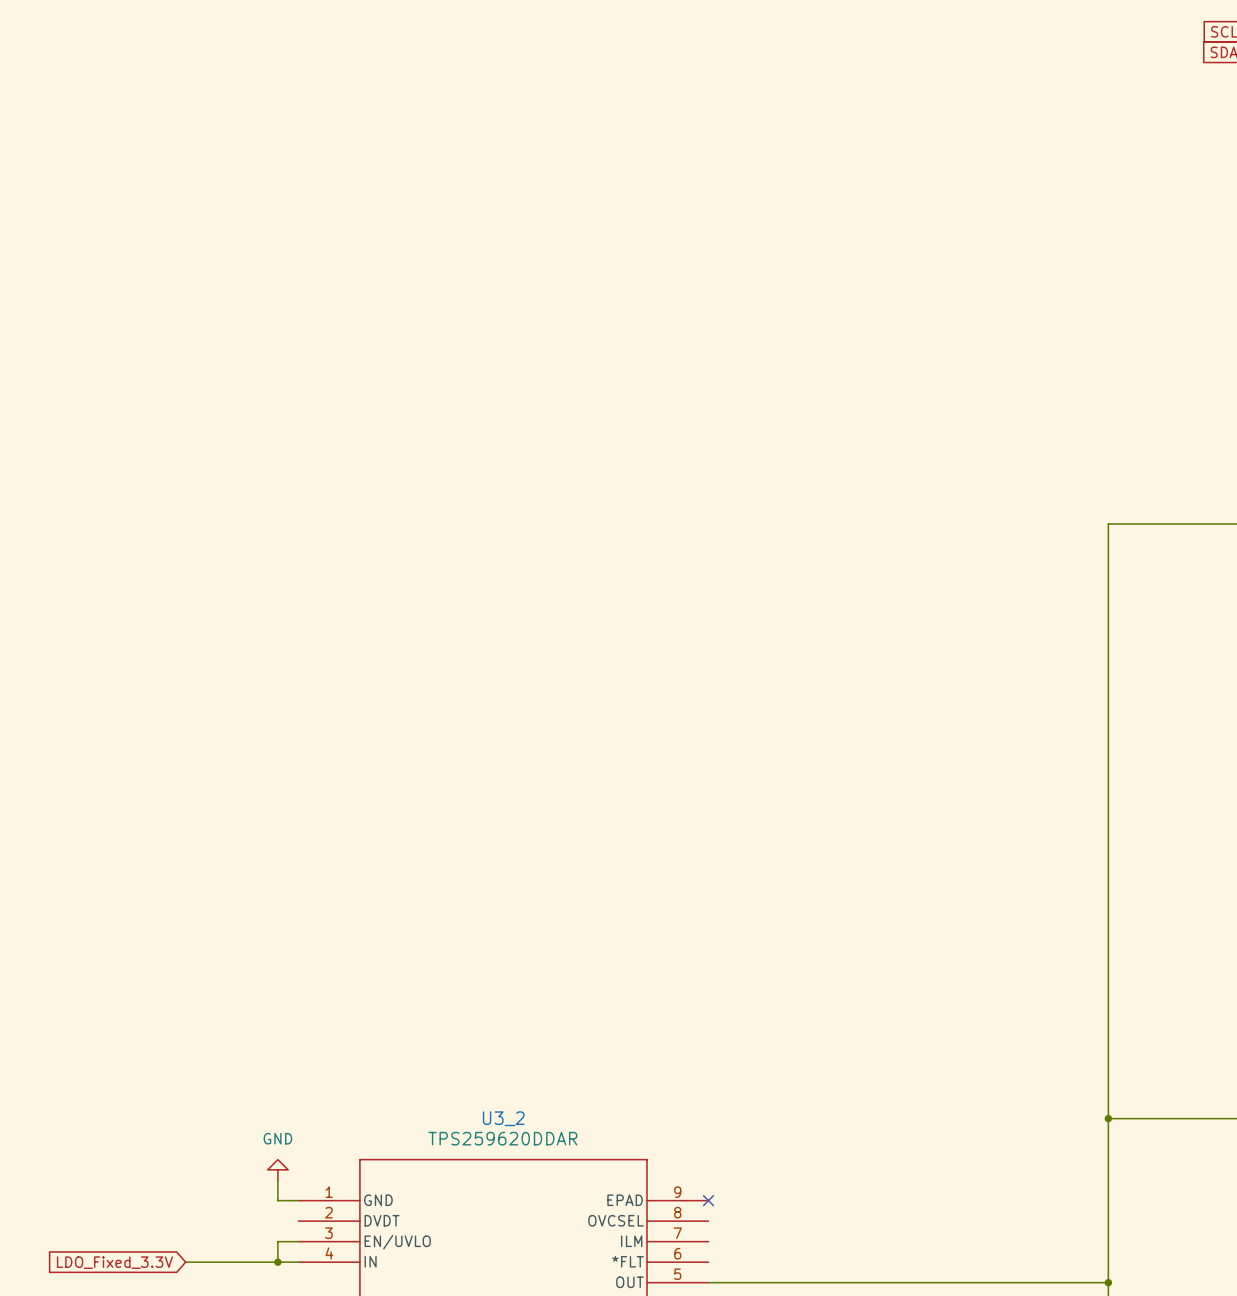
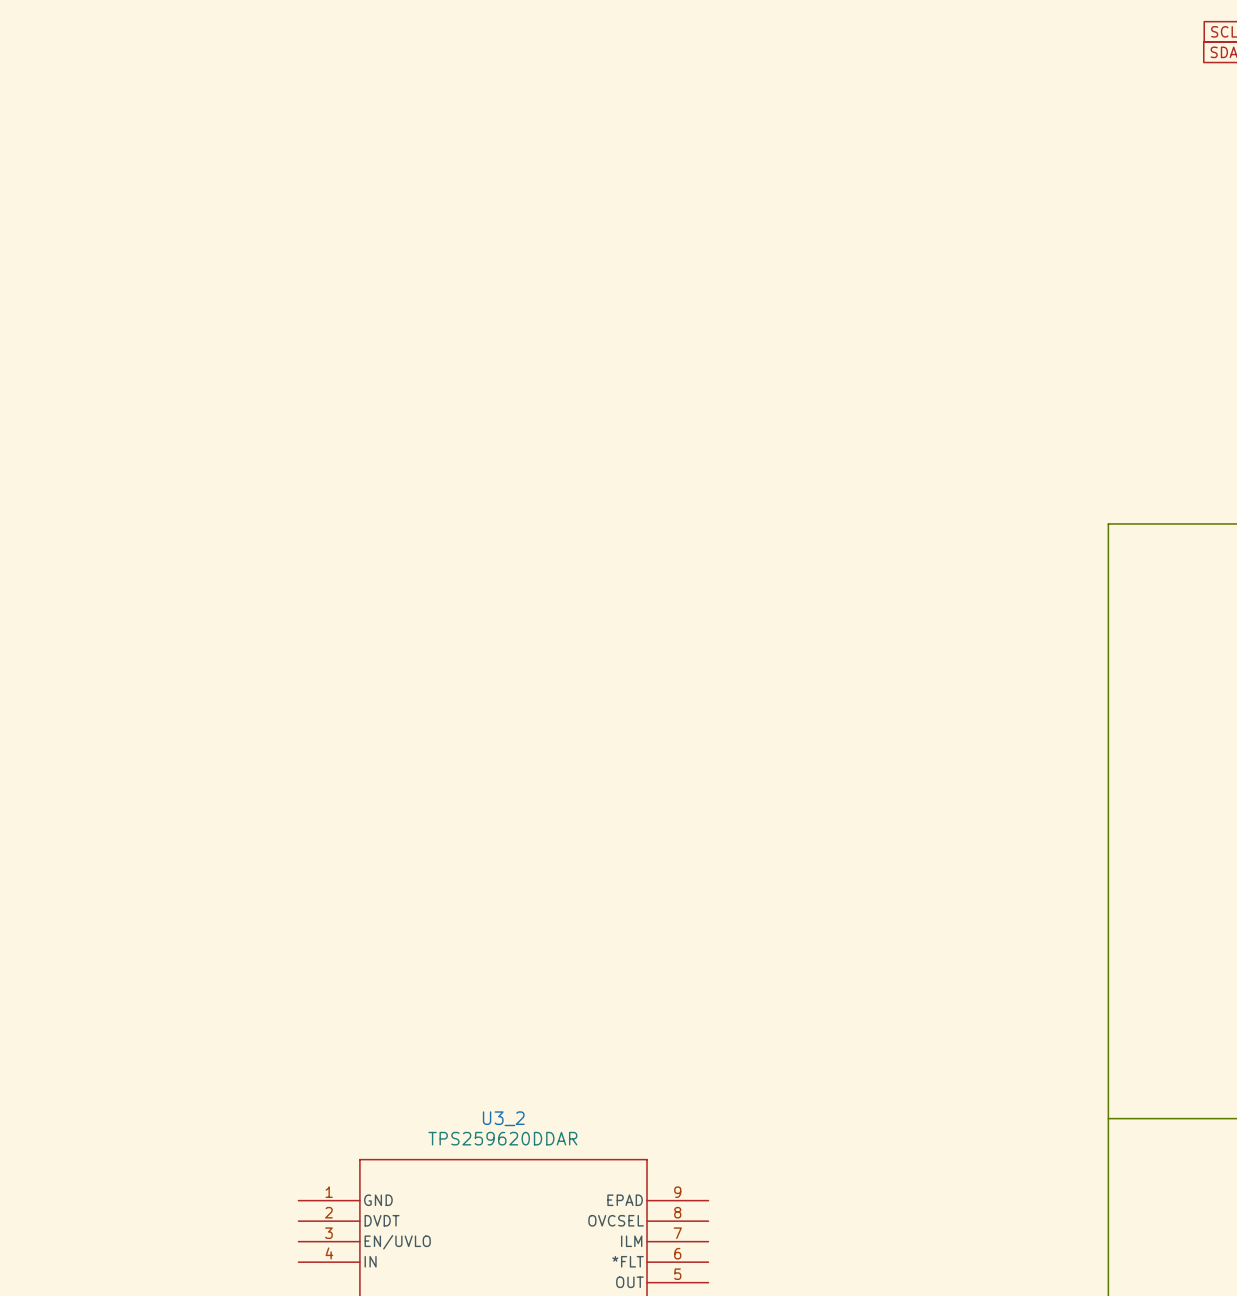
junction: (1108, 1118) -> none
power symbol: GND (277, 1169) -> none
wire: (277, 1180) (277, 1200) (298, 1200) -> none
no-connect mark: (708, 1200) -> none
wire: (298, 1241) (277, 1241) (277, 1262) -> none
global label: LDO_Fixed_3.3V (114, 1262) -> none
wire: (185, 1262) (298, 1262) -> none
junction: (277, 1262) -> none
wire: (708, 1282) (1108, 1282) -> none
junction: (1108, 1282) -> none

